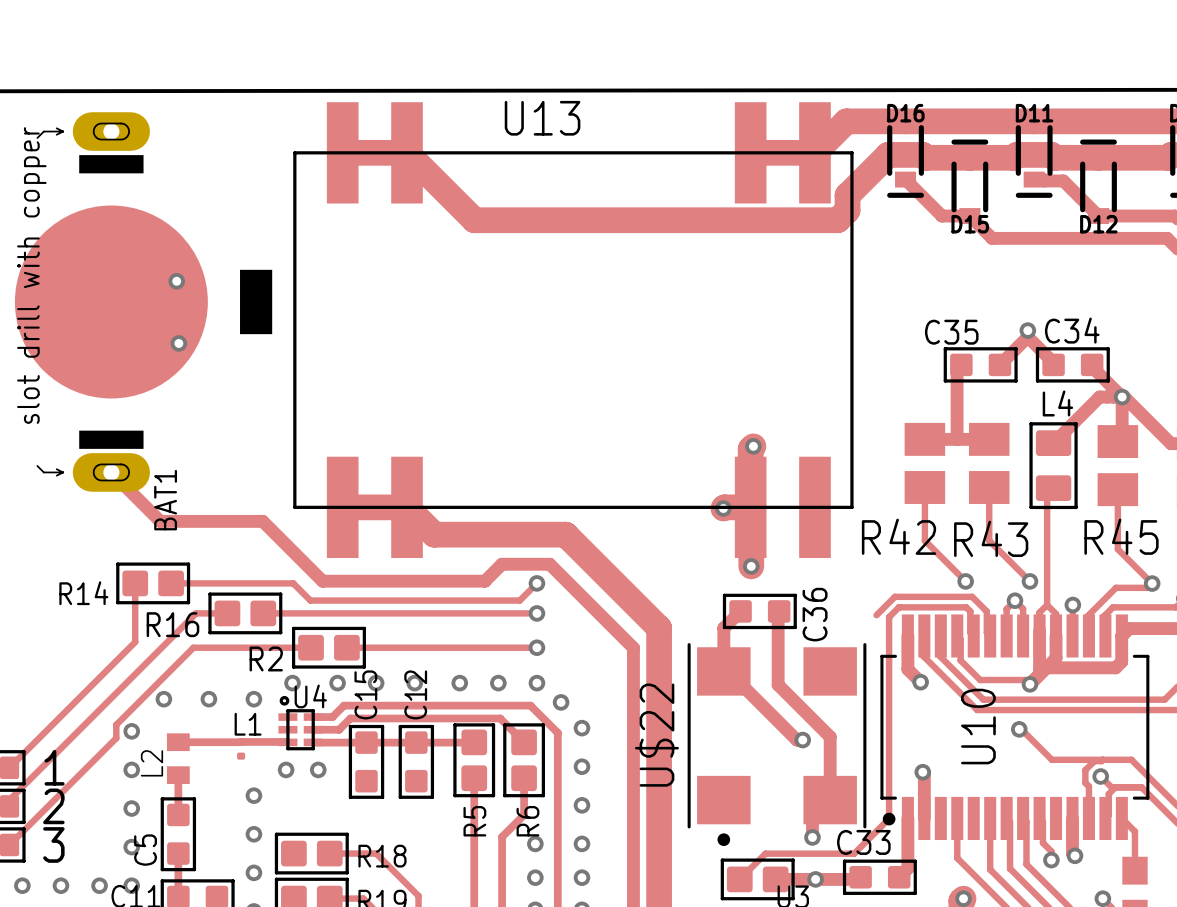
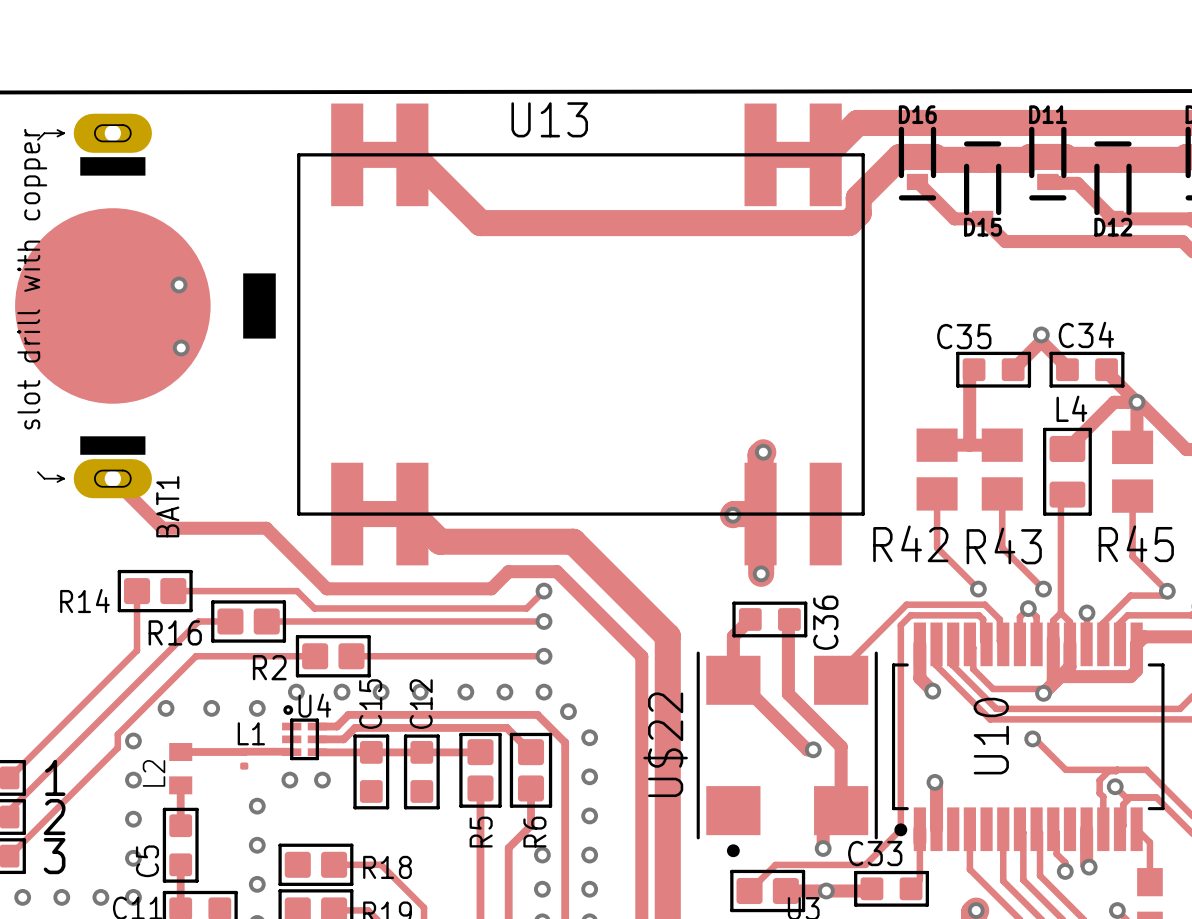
track: none -> (888, 623) (841, 670) (841, 680)
track width: thick (907, 831) (907, 868) (899, 877) -> thin (919, 842) (919, 880) (911, 888)

